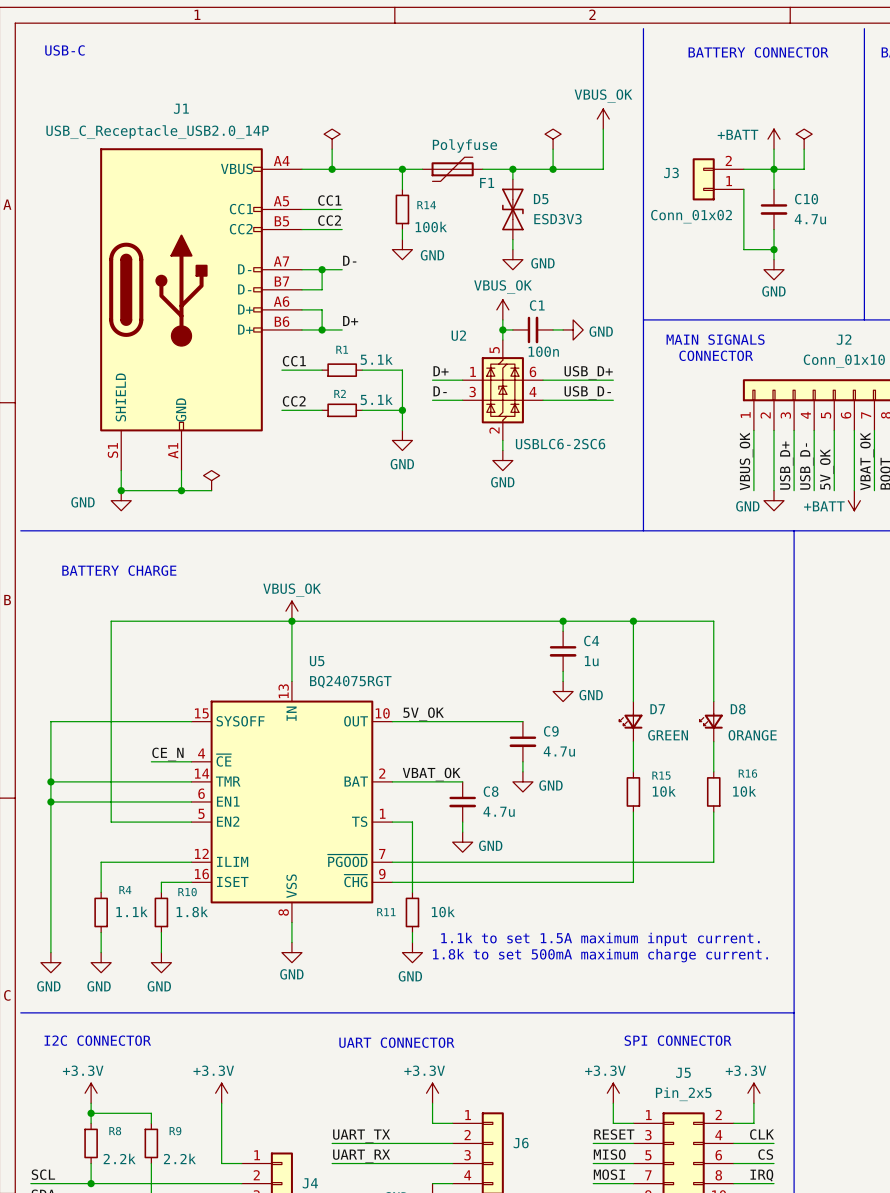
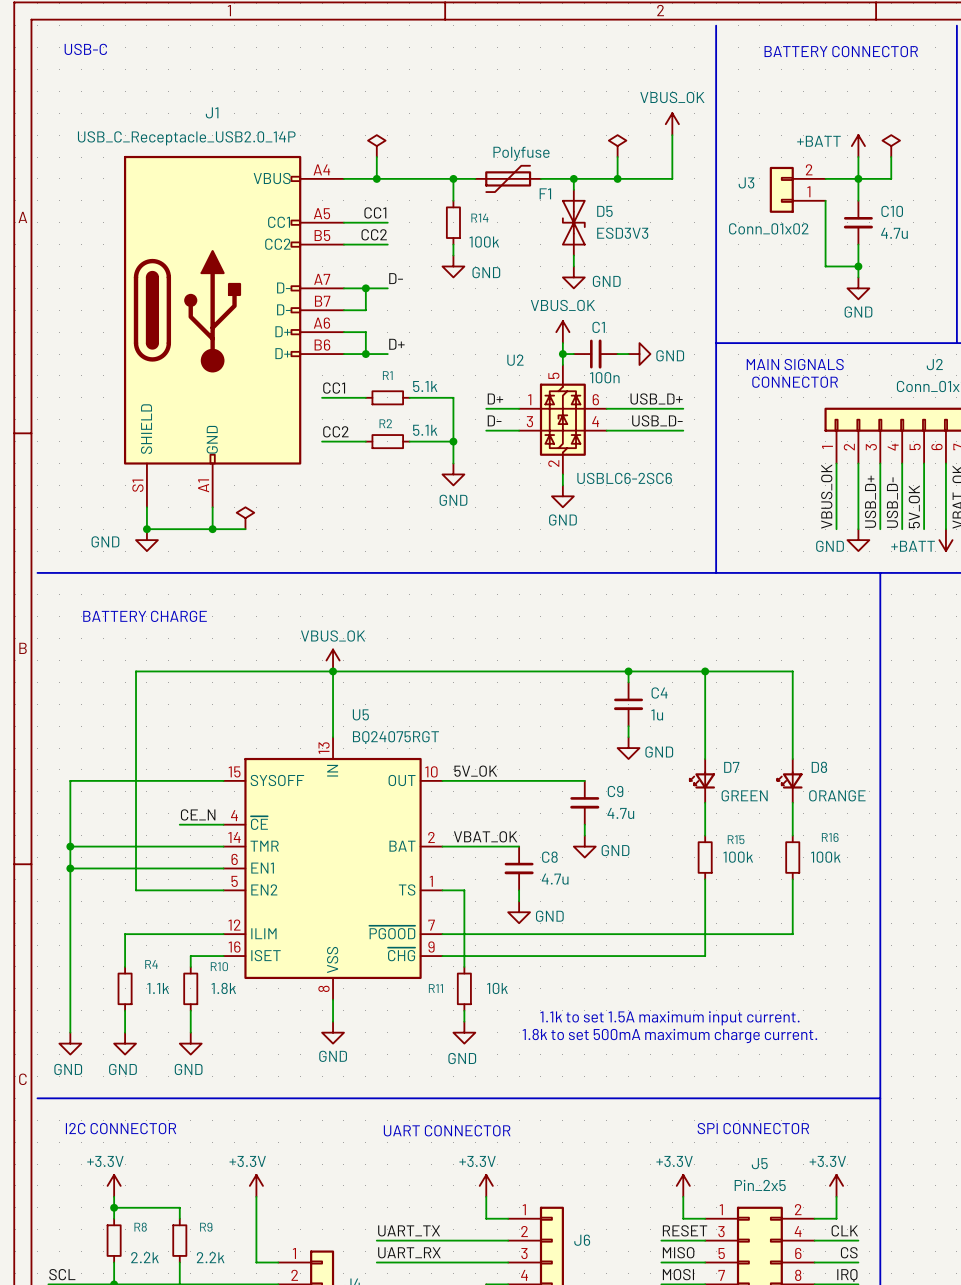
R15 value: 10k (664, 791) -> 100k (738, 857)
R16 value: 10k (744, 791) -> 100k (825, 857)

